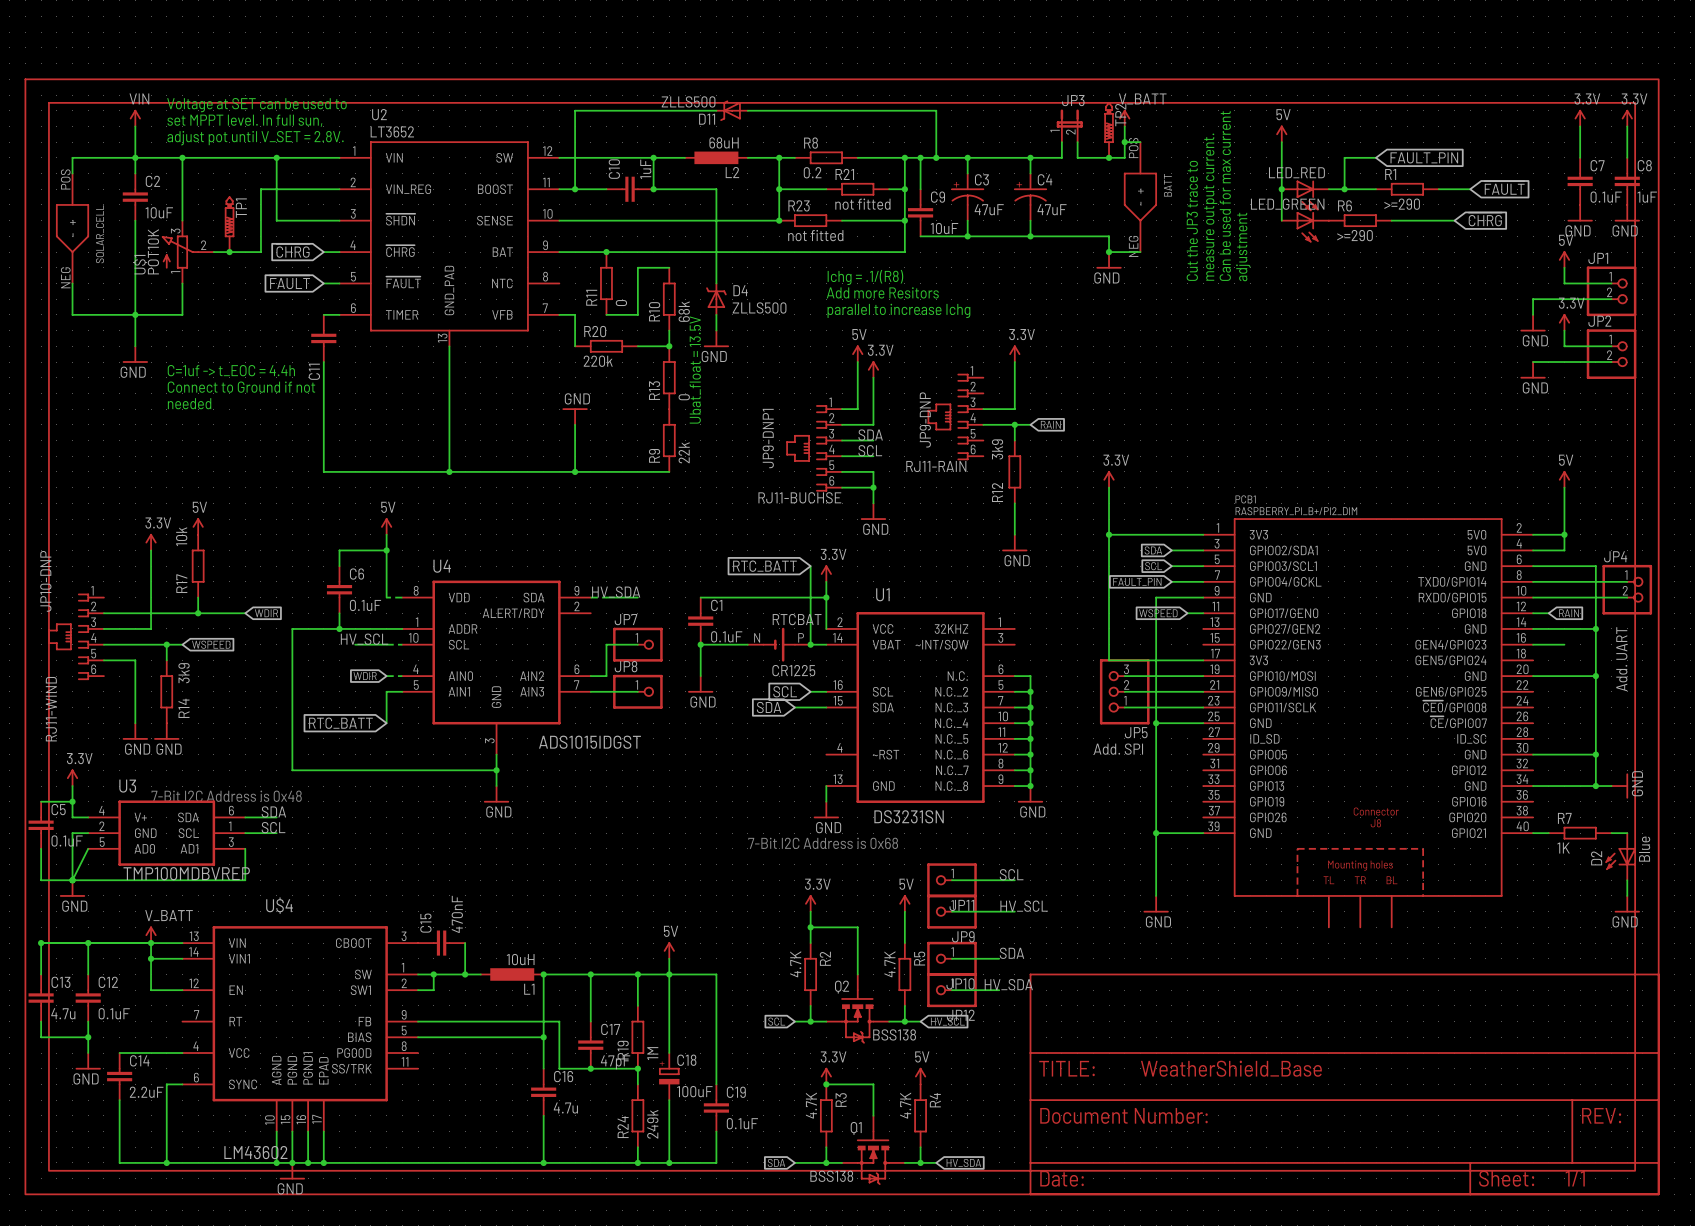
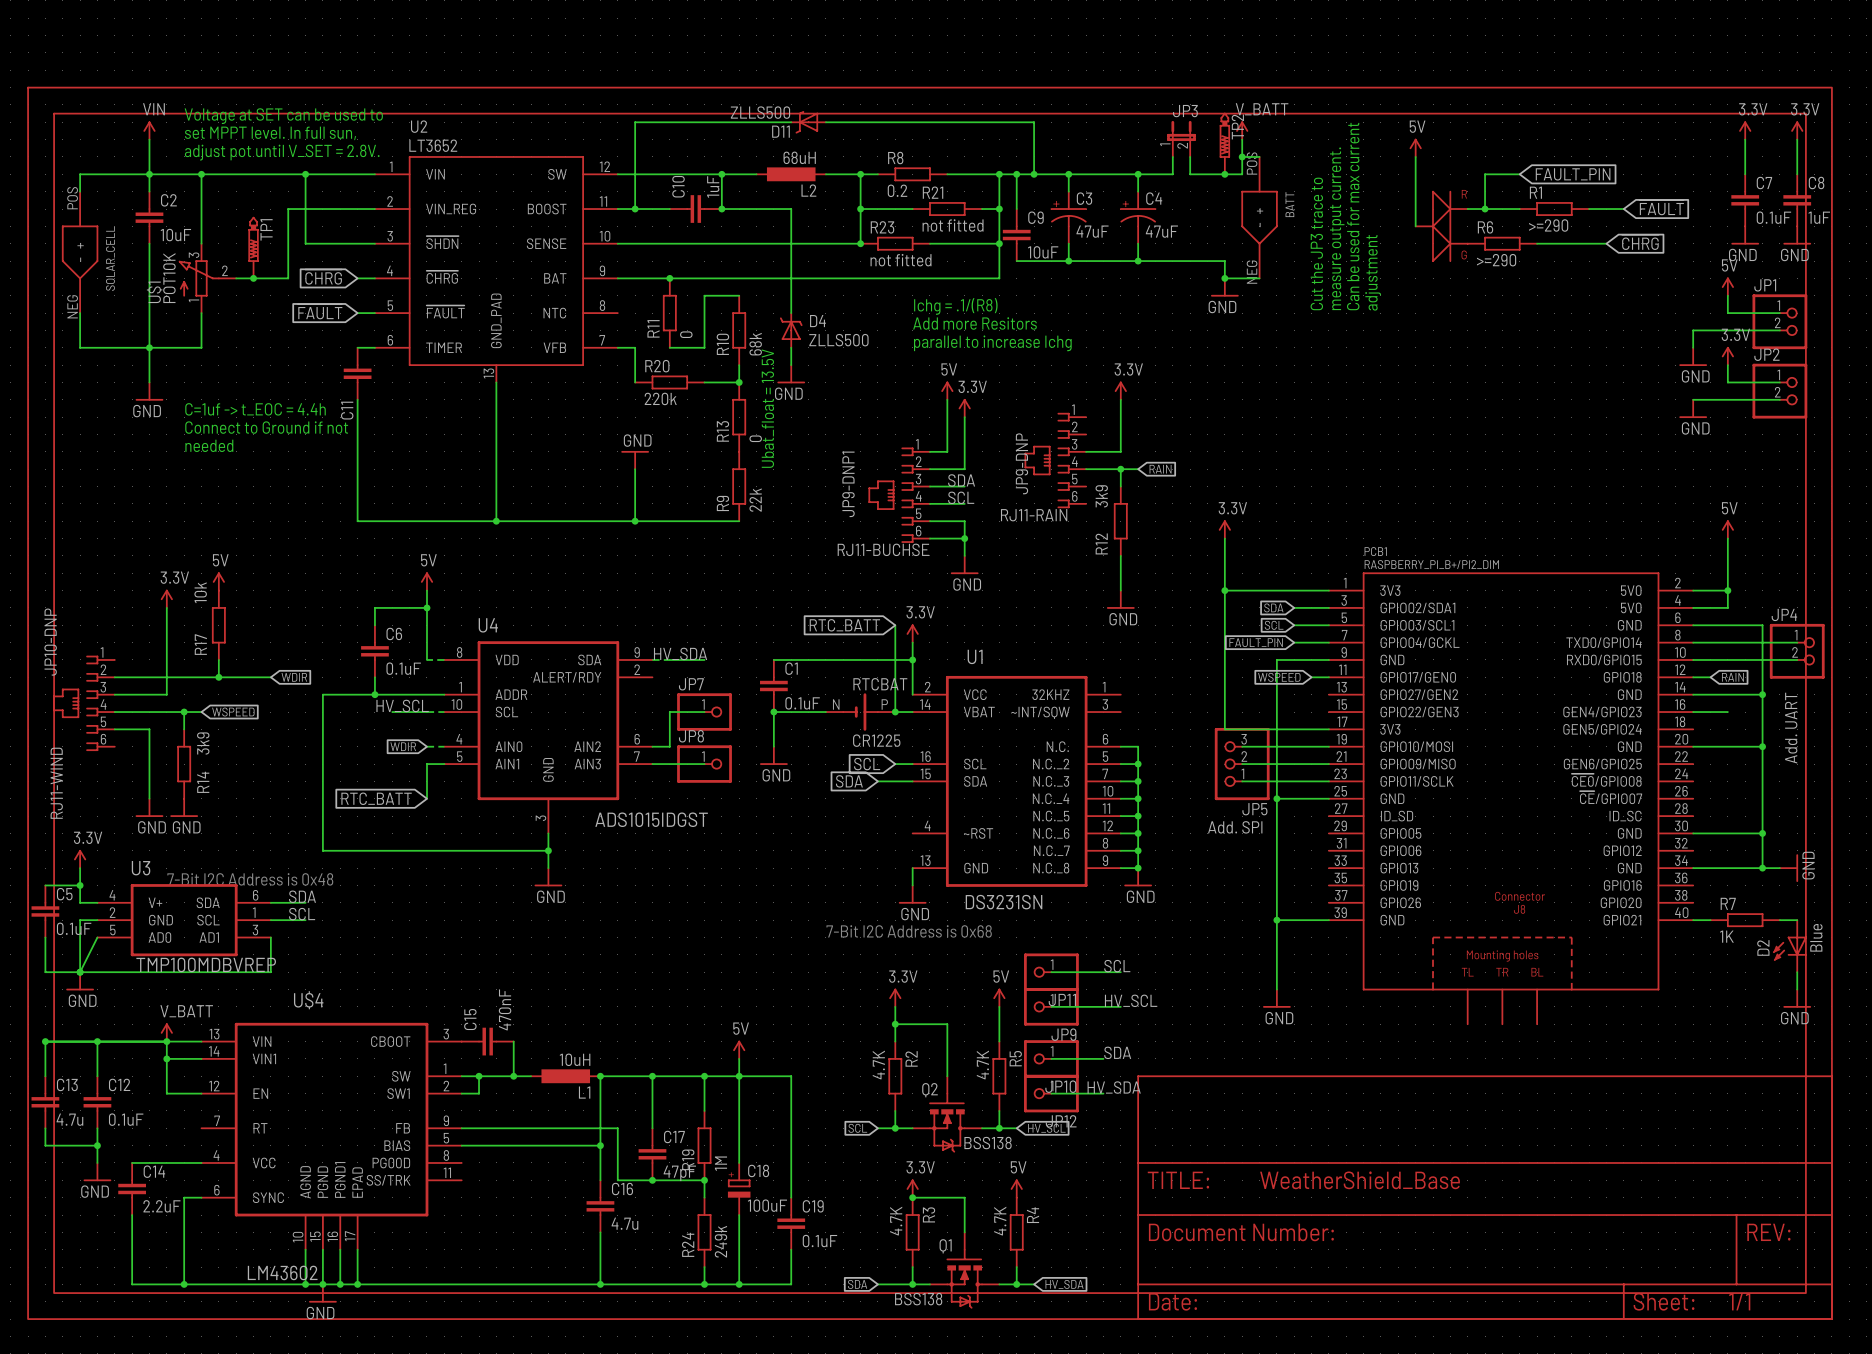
junction: (1281, 189) -> none
LED_RED: (1305, 195) -> none
wire: (1281, 204) (1281, 220) -> none
part: none -> (1441, 226)
LED_GREEN: (1305, 227) -> none

